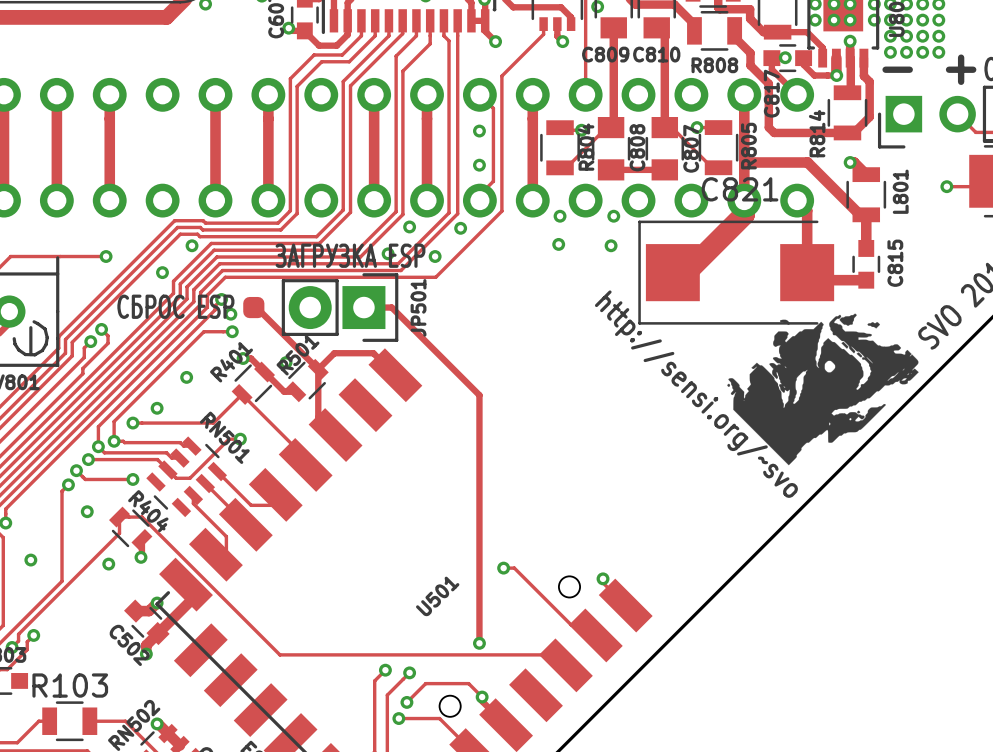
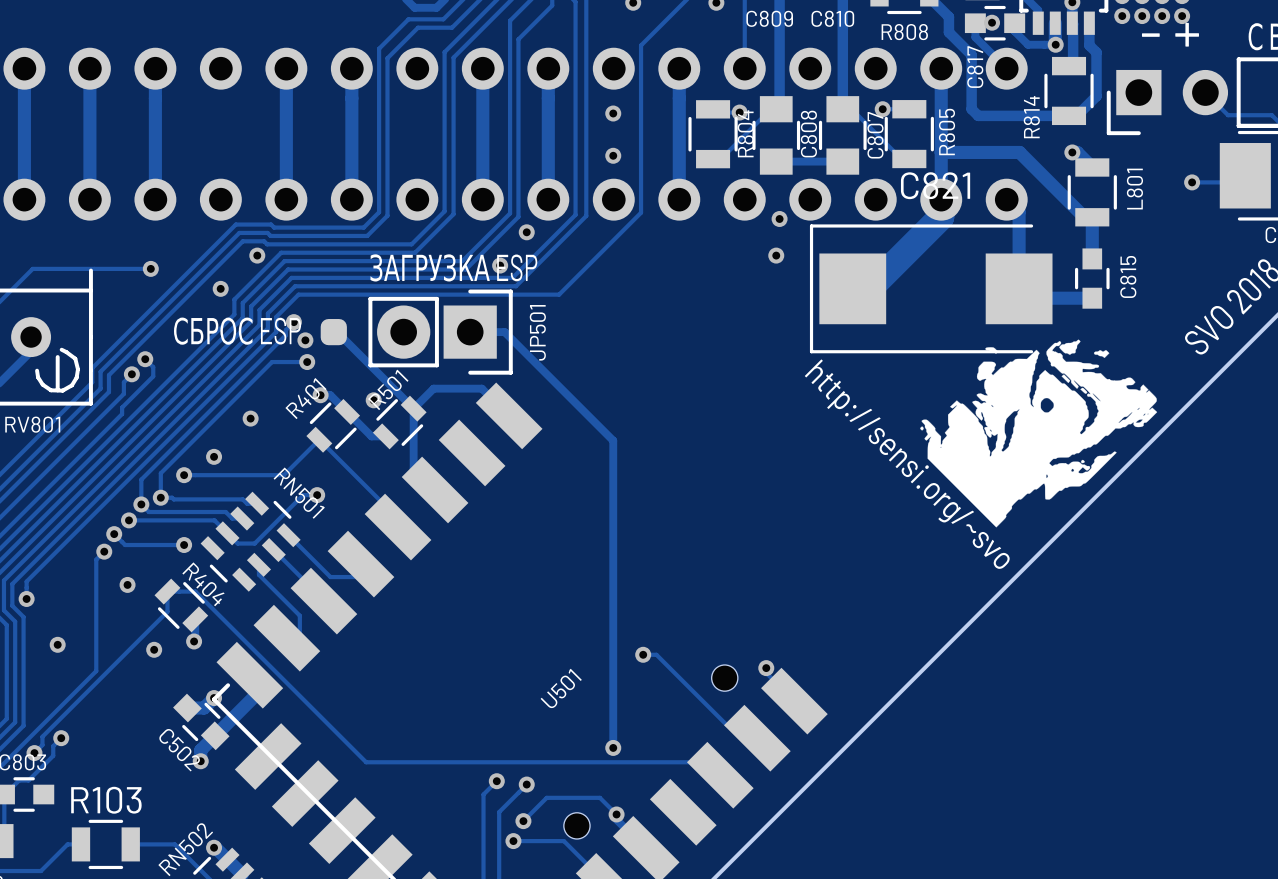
track: (479, 94) (493, 108) (493, 181) (479, 194) (479, 200) -> none
via: (560, 216) -> none
via: (460, 228) -> none
via: (558, 244) -> none
via: (435, 256) -> none

